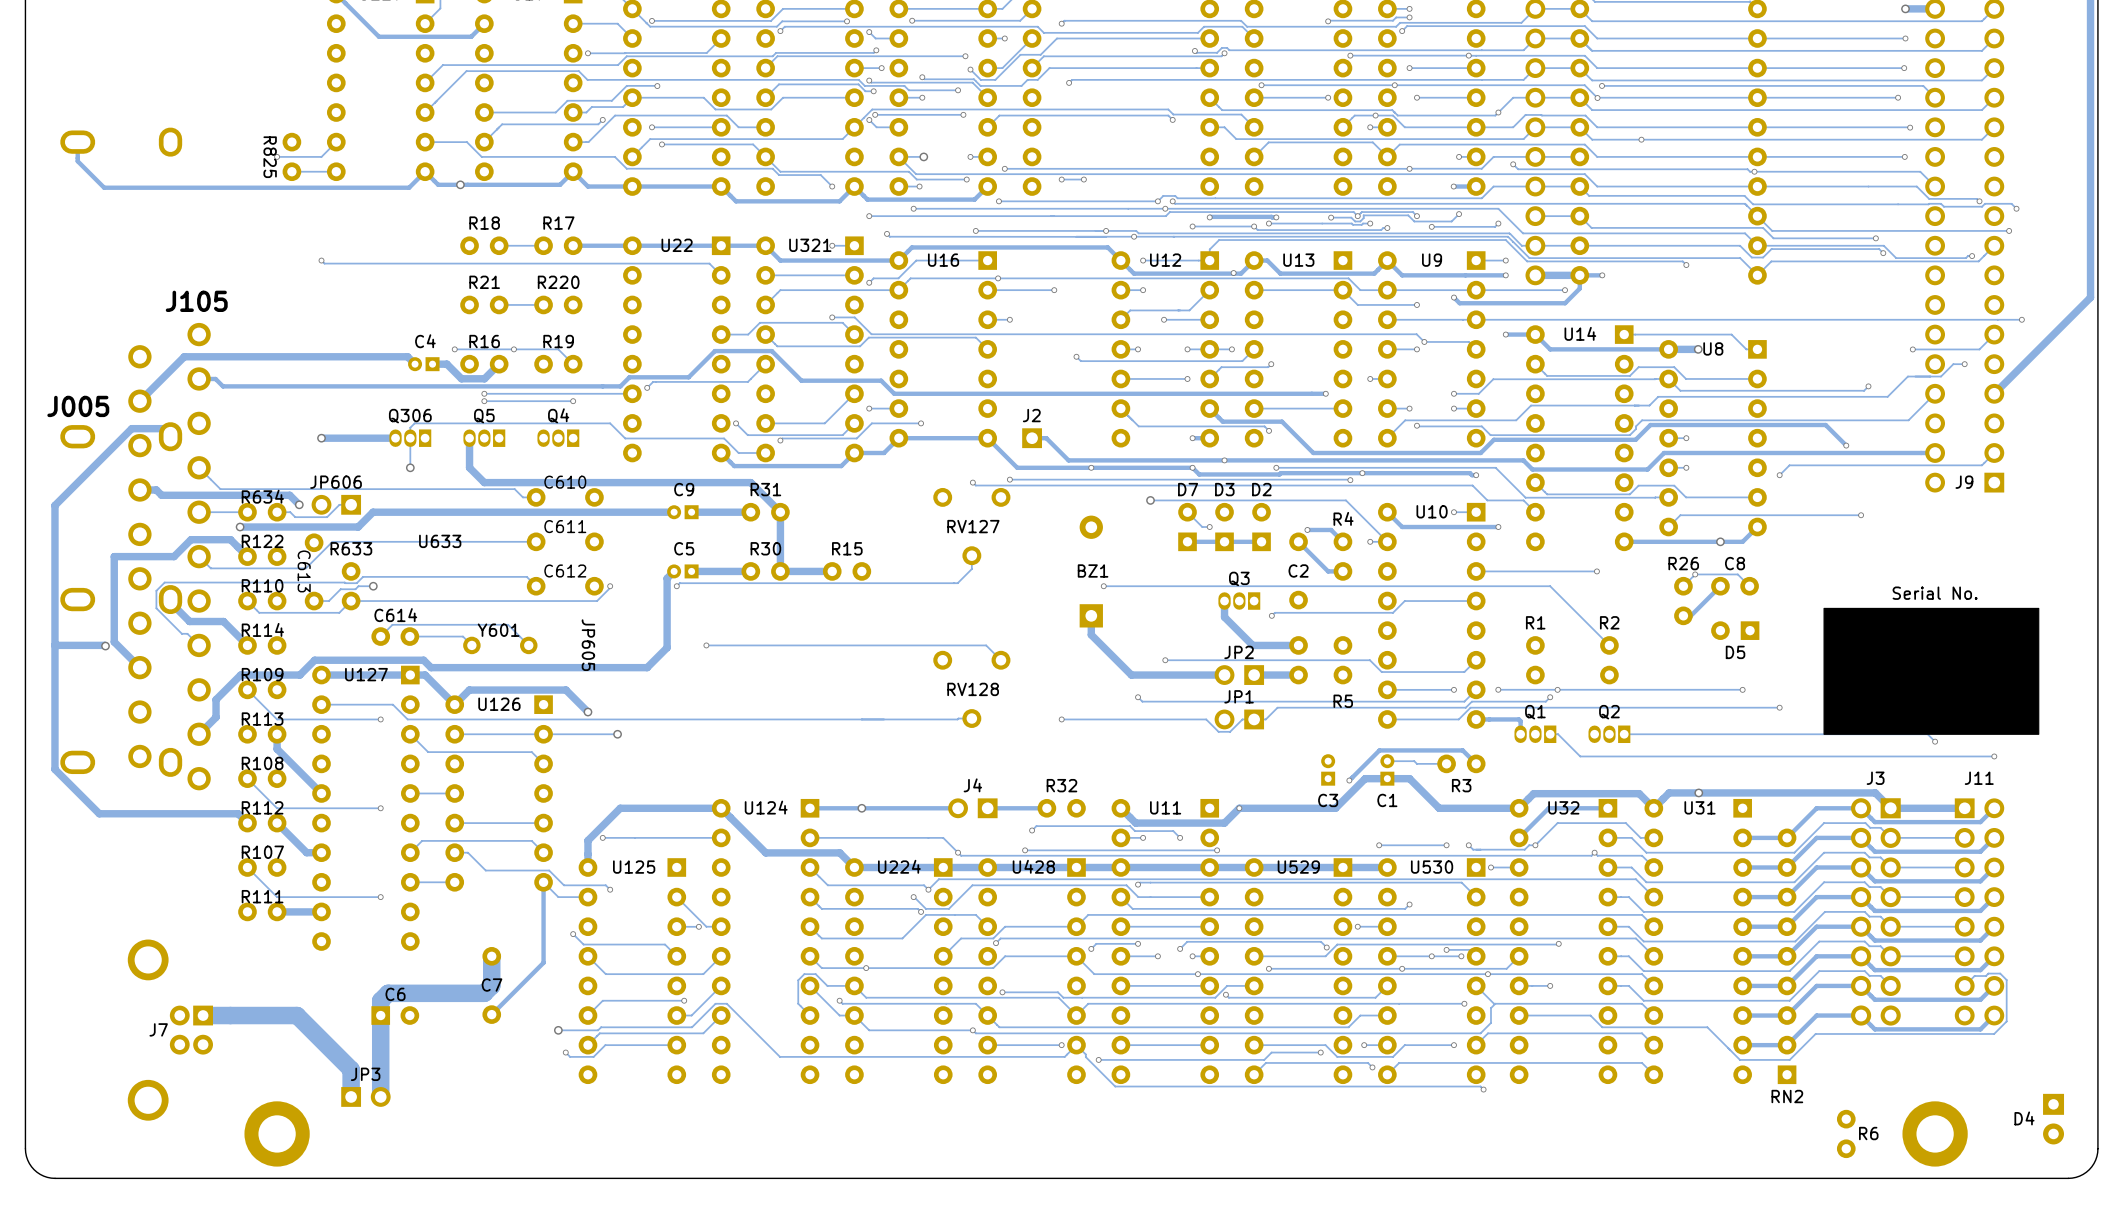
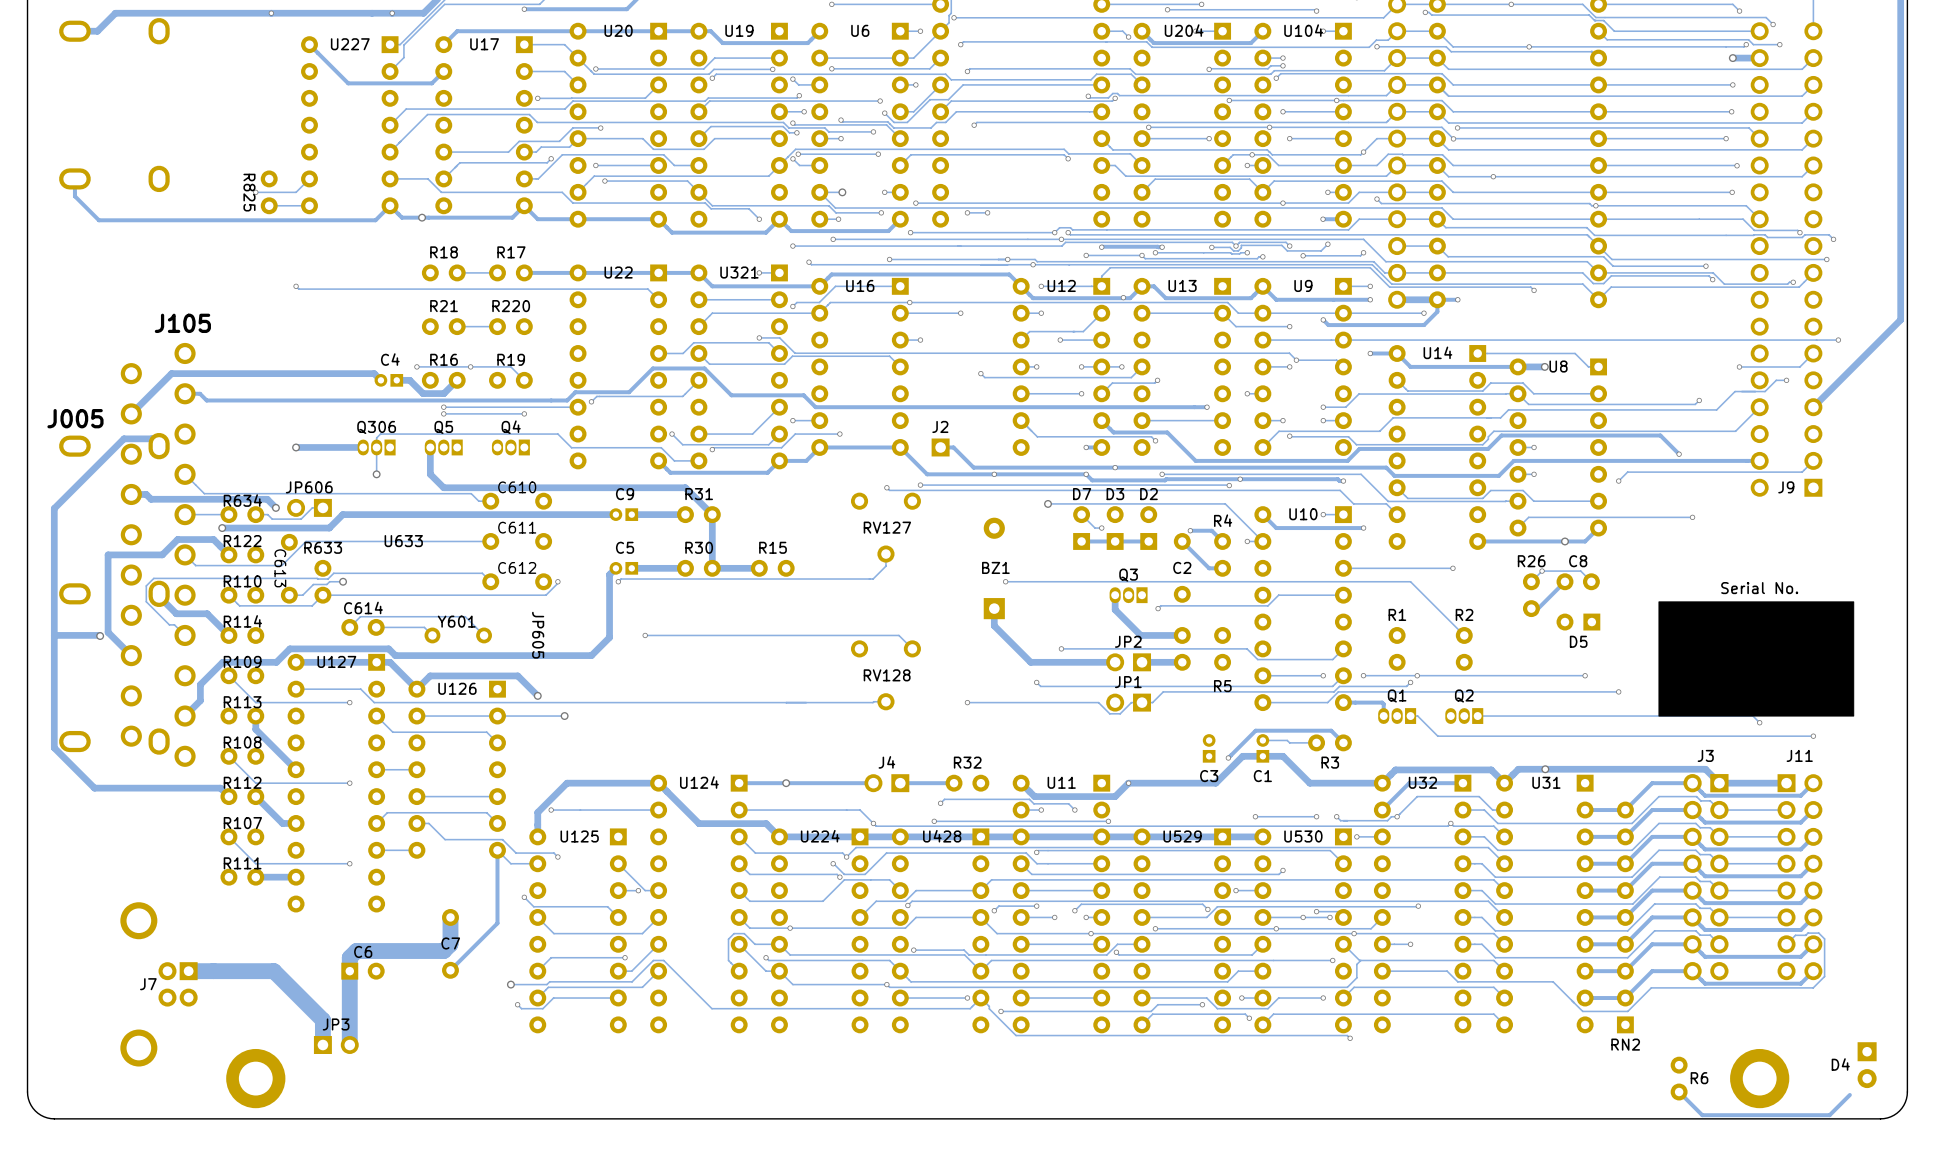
track: none -> (1679, 1092) (1702, 1115) (1829, 1115) (1849, 1094)

